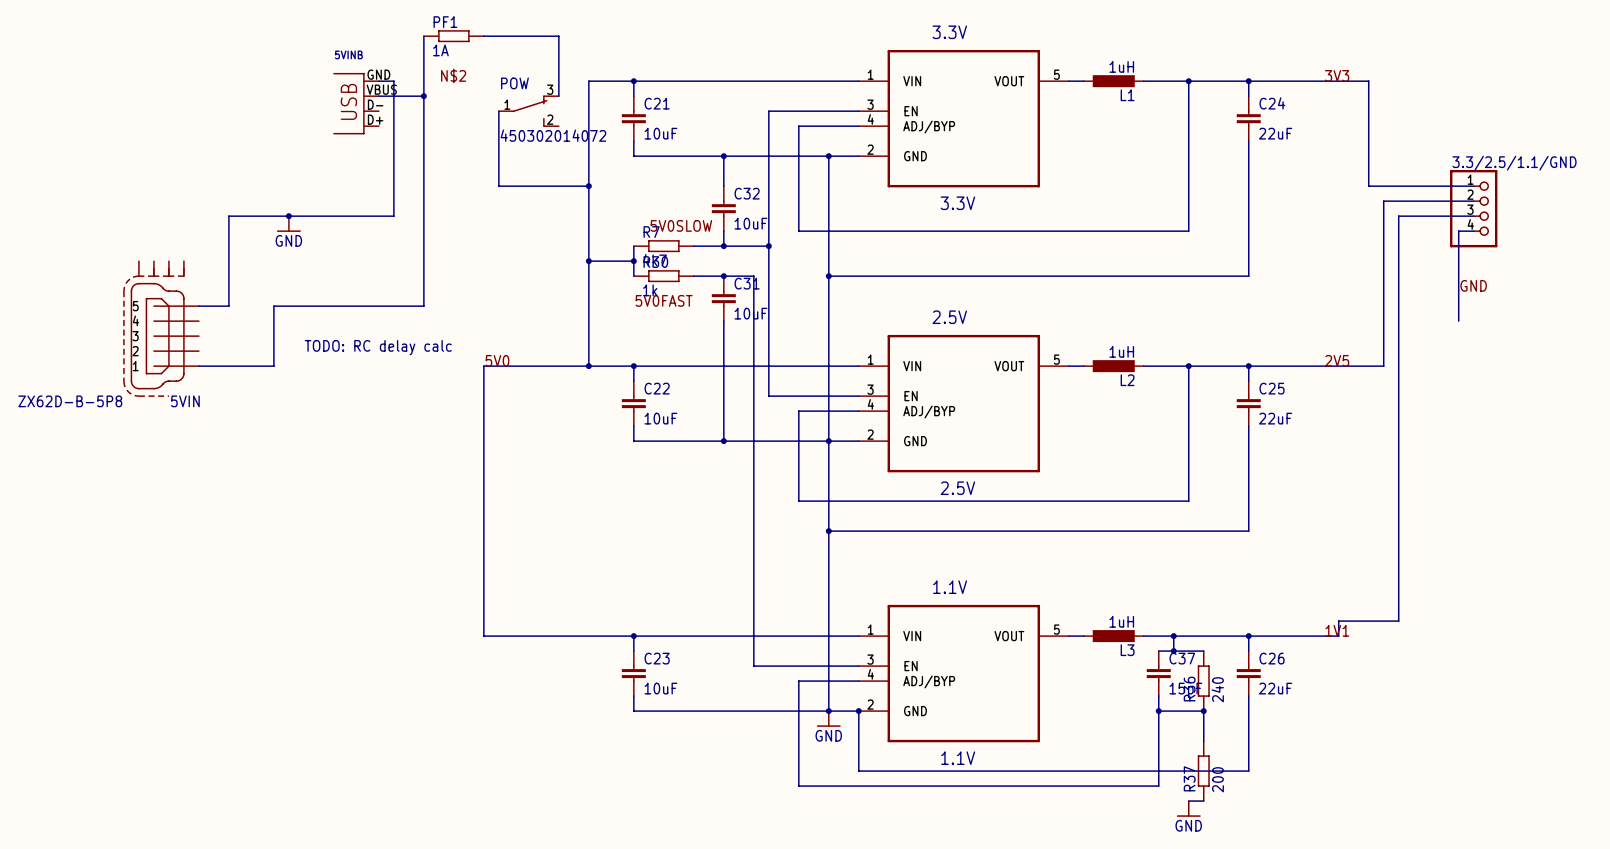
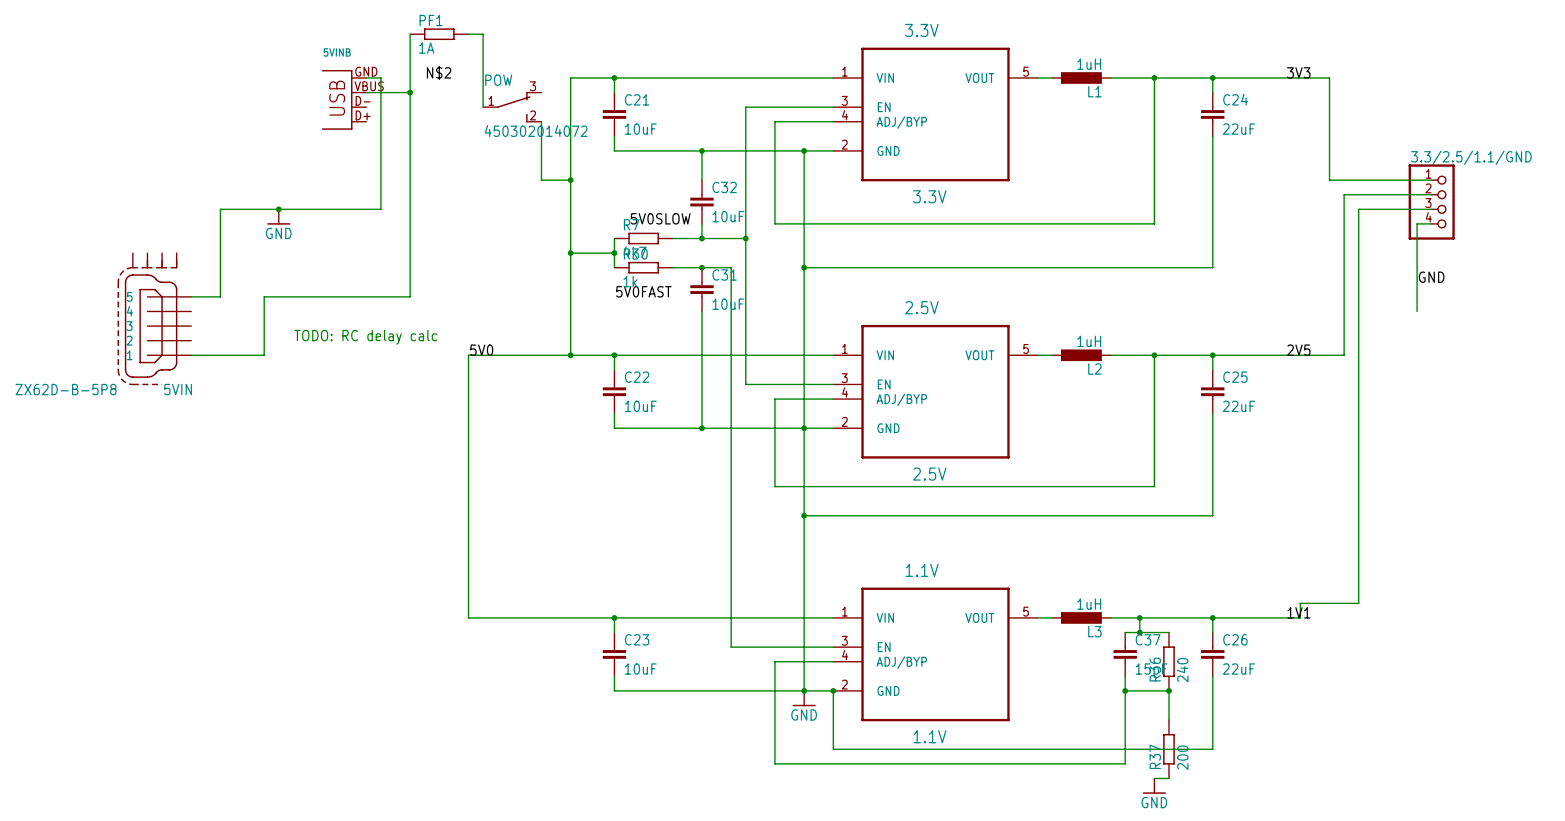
wire: (498, 36) (558, 36) (558, 96) -> (483, 34) (483, 107)
wire: (498, 111) (498, 186) (558, 186) -> (541, 121) (541, 180)

